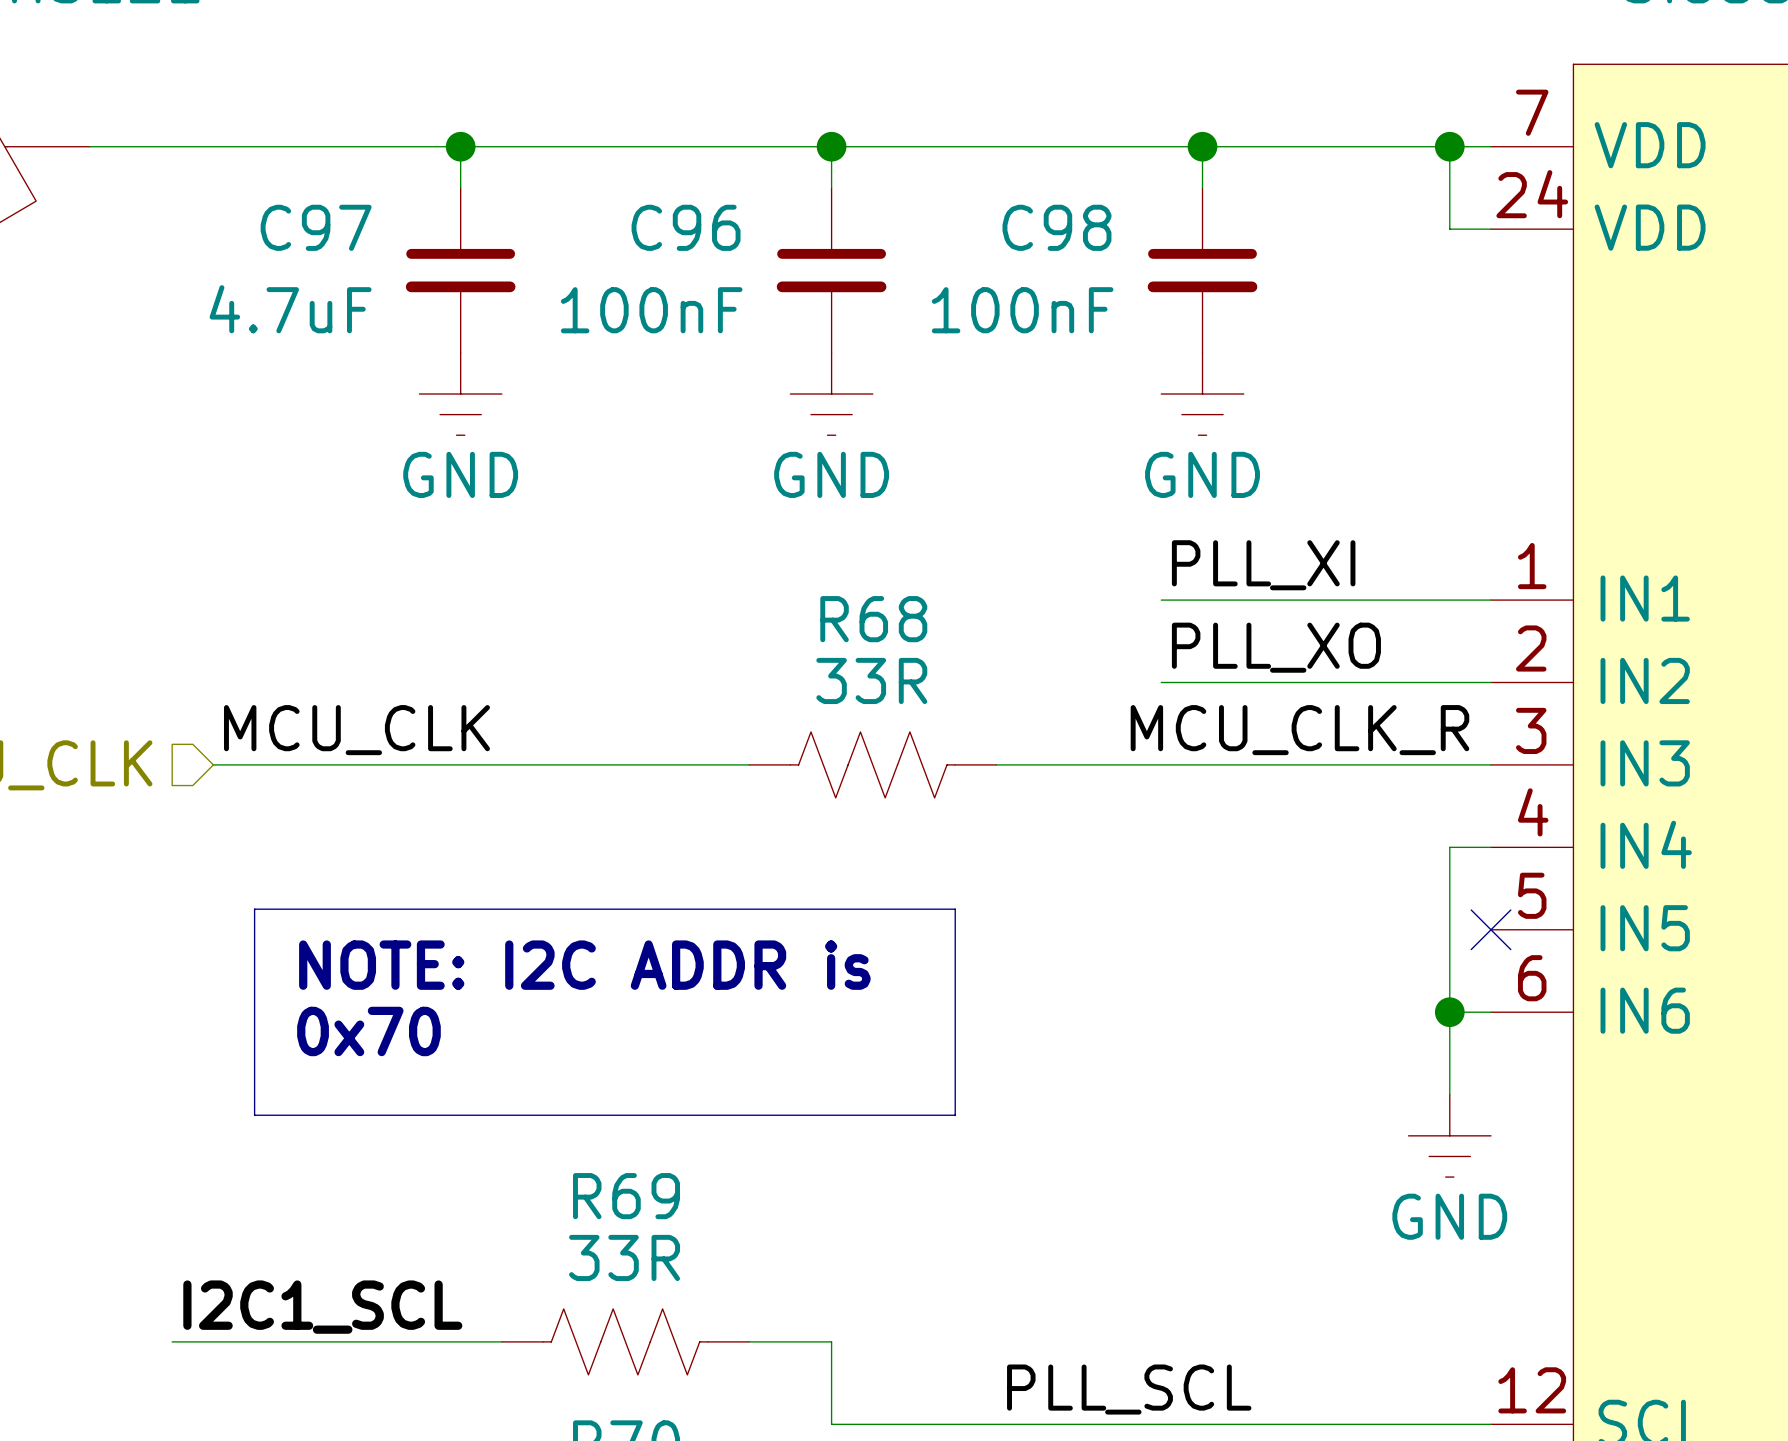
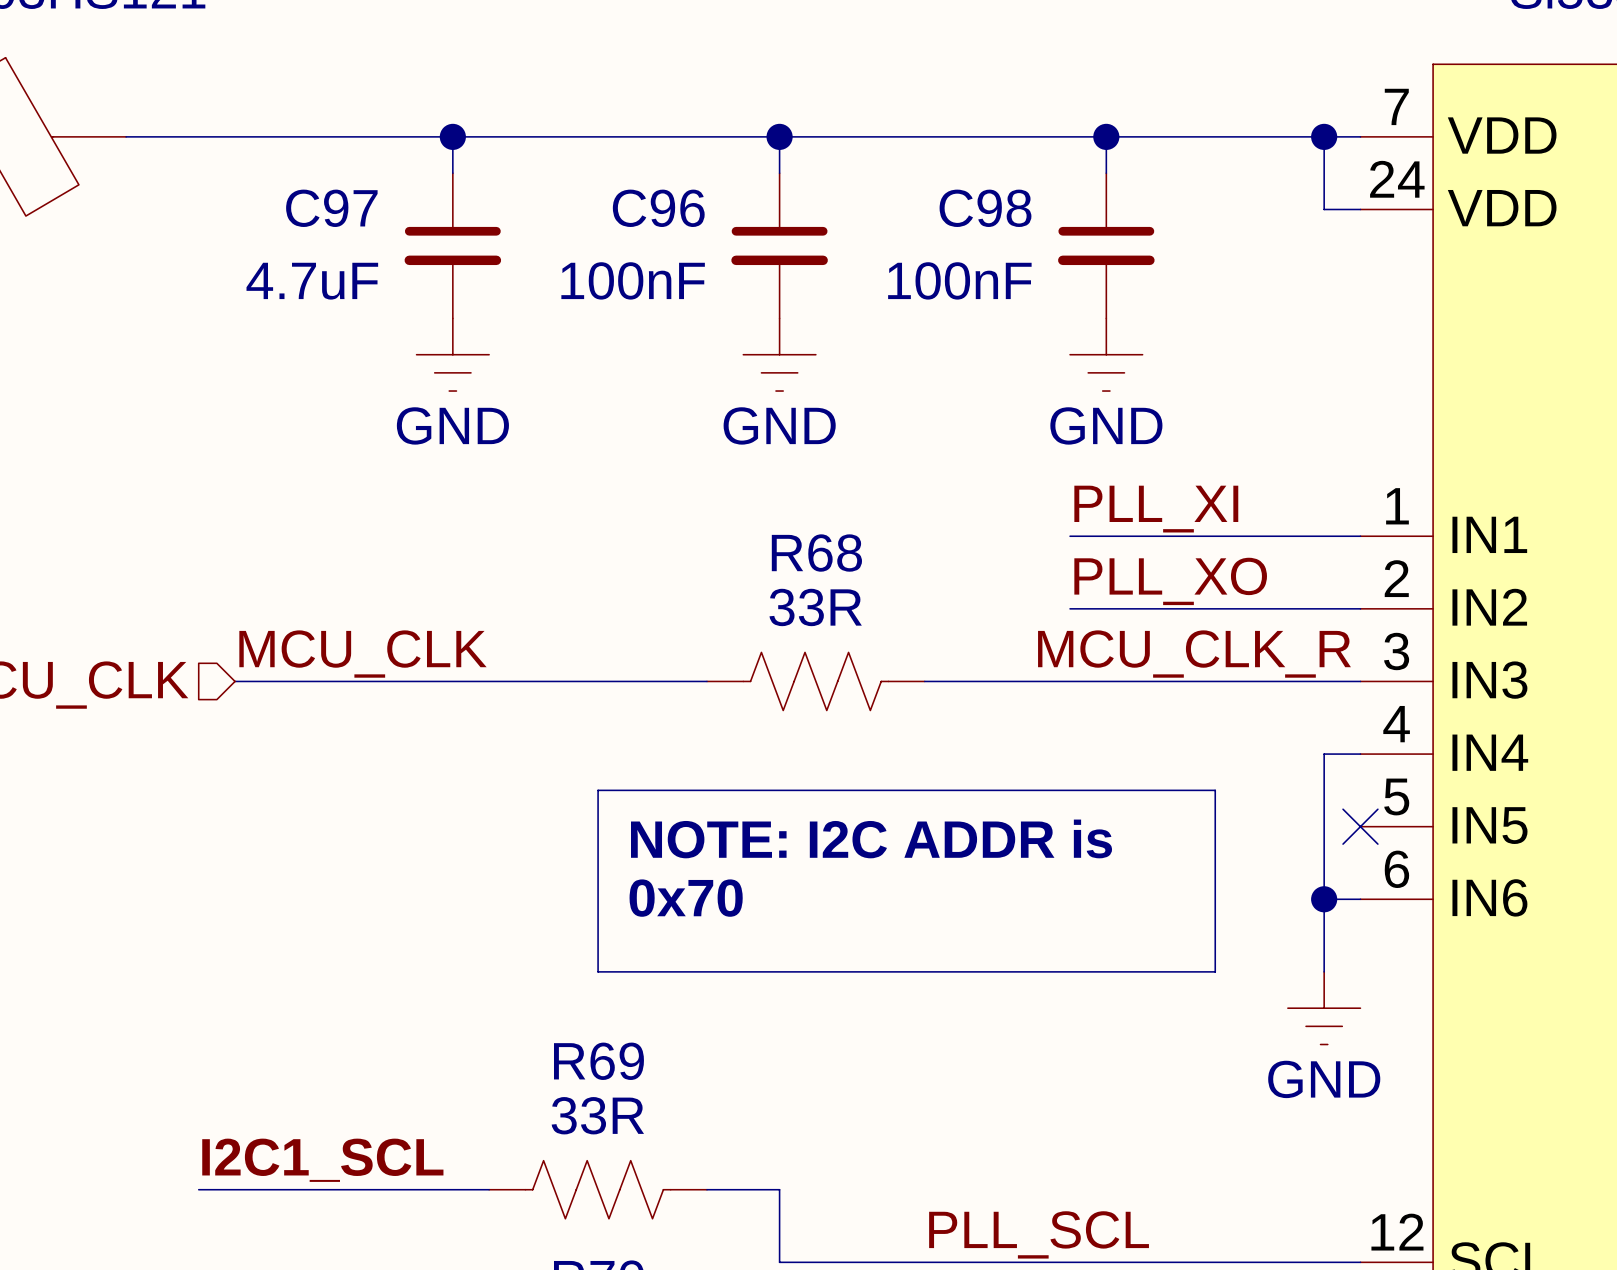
line: (254, 909) (955, 909) (955, 1115) (254, 1115) (254, 909) -> (598, 790) (1215, 790) (1215, 971) (598, 971) (598, 790)
text position: NOTE: I2C ADDR is (584, 965) -> NOTE: I2C ADDR is (871, 838)
text position: 0x70 (368, 1031) -> 0x70 (686, 898)

